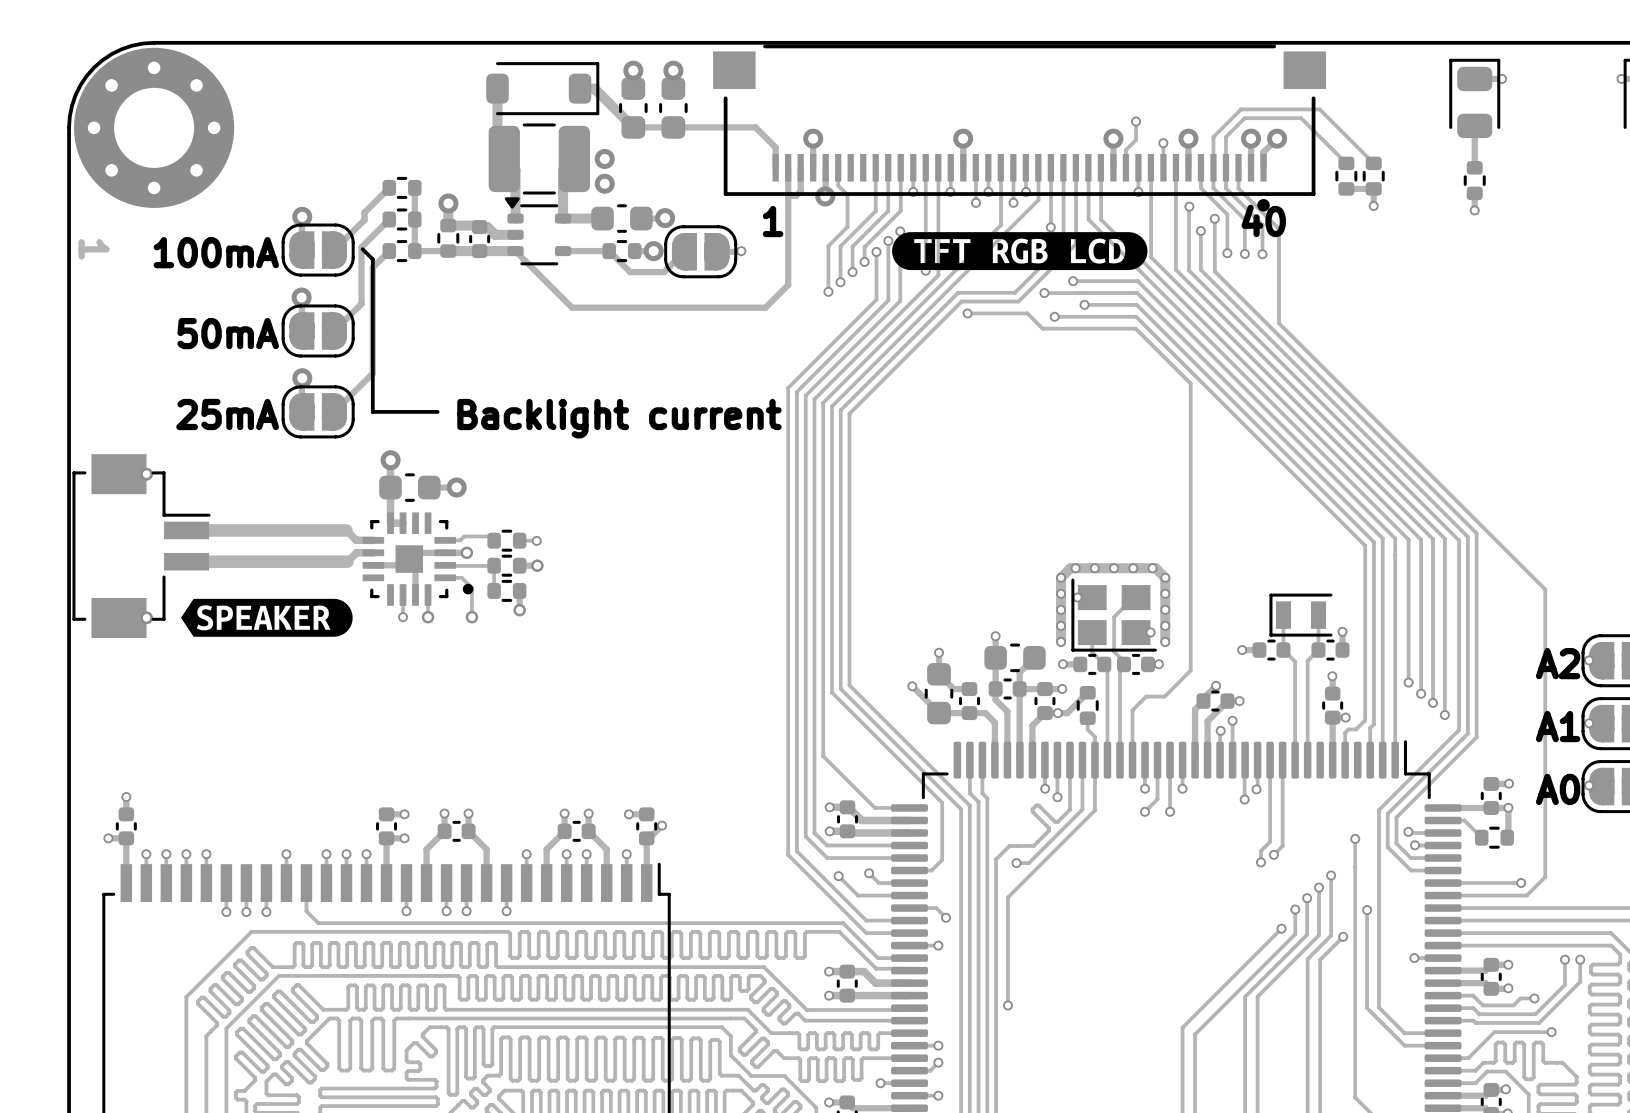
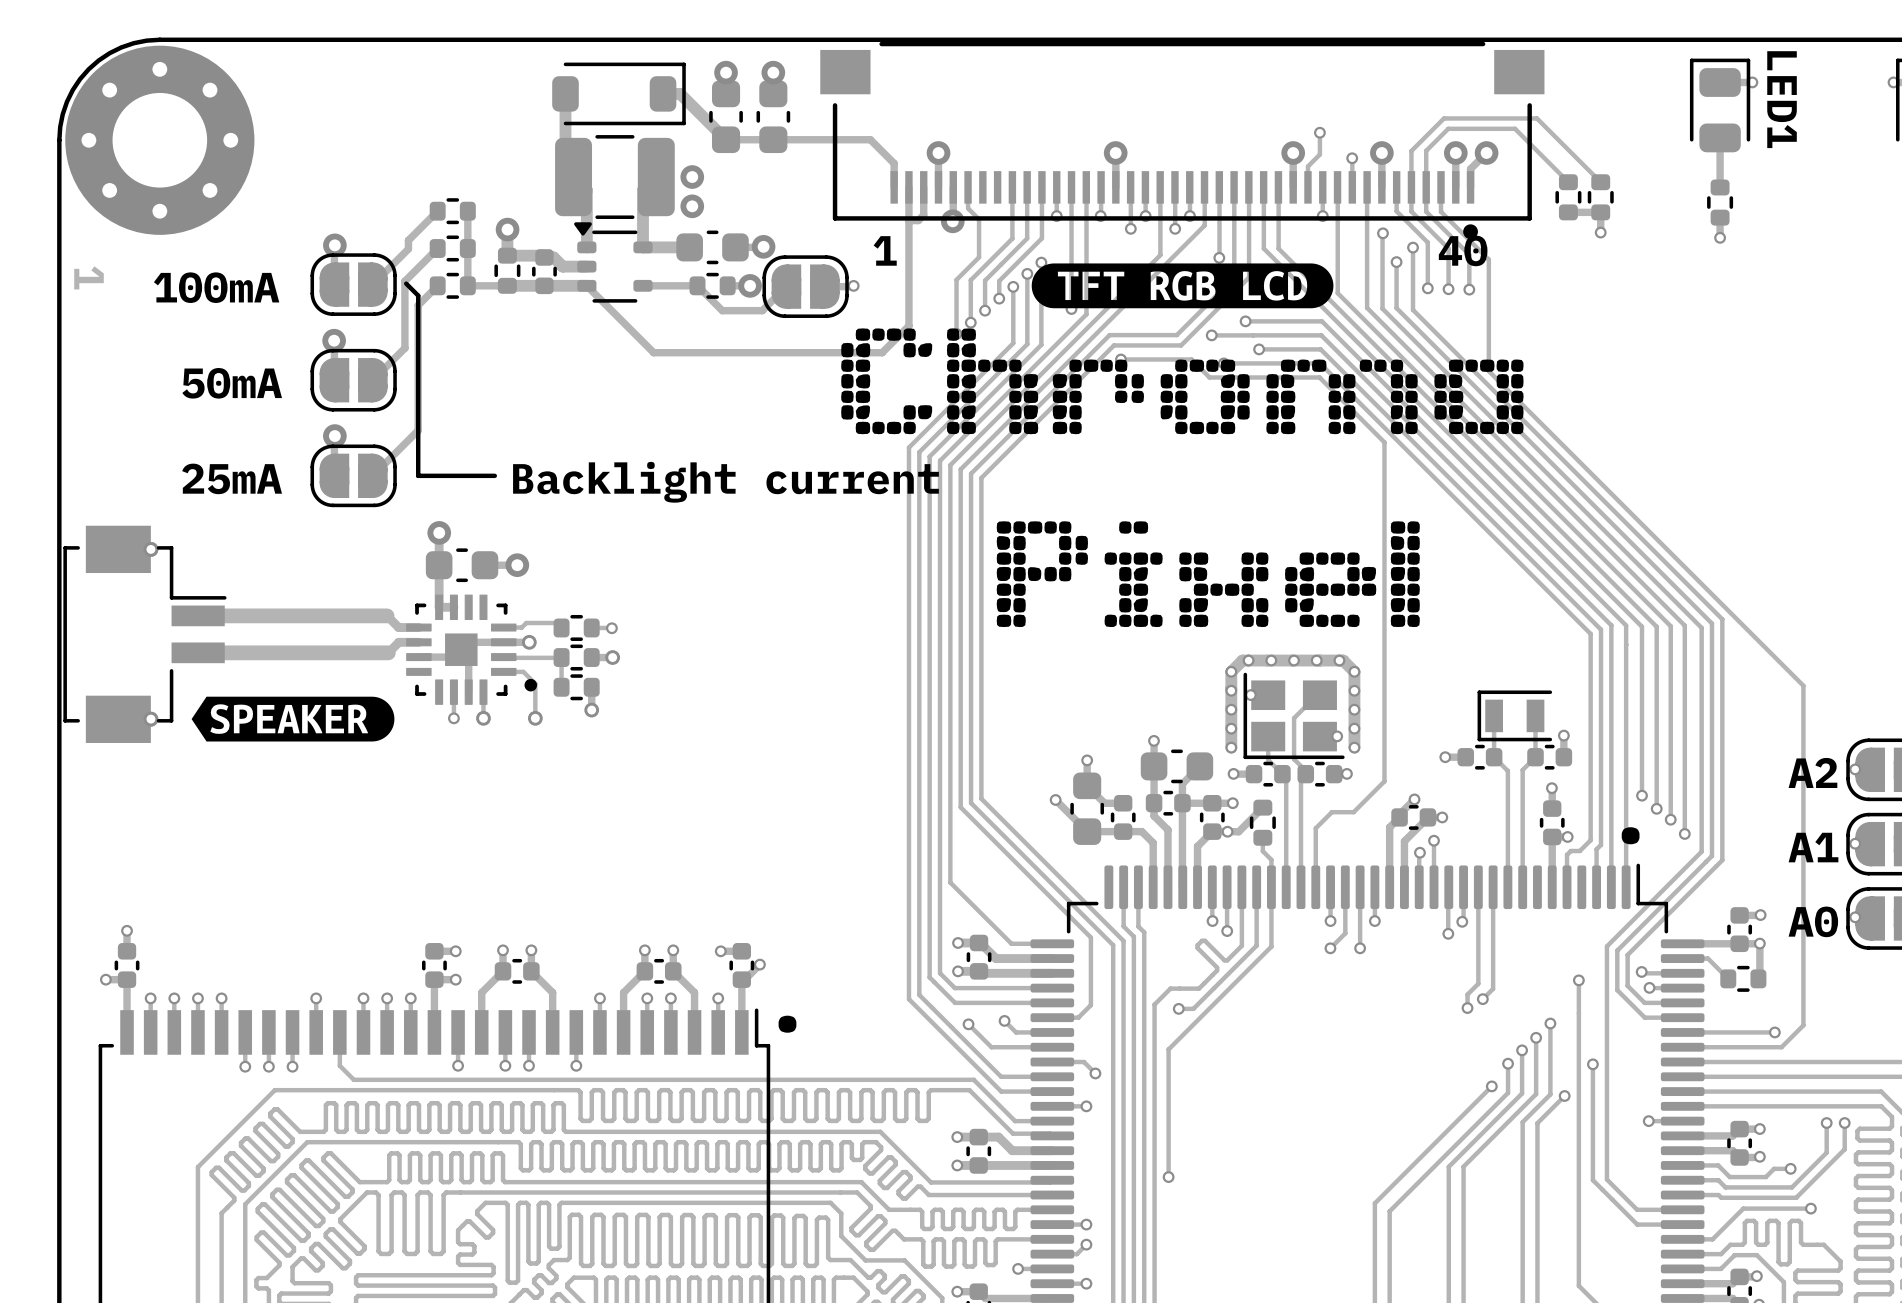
text: none -> LED1 (1782, 99)
drawing: none -> [841, 328, 1524, 628]
text: none -> . (1630, 835)
text: none -> . (787, 1024)

